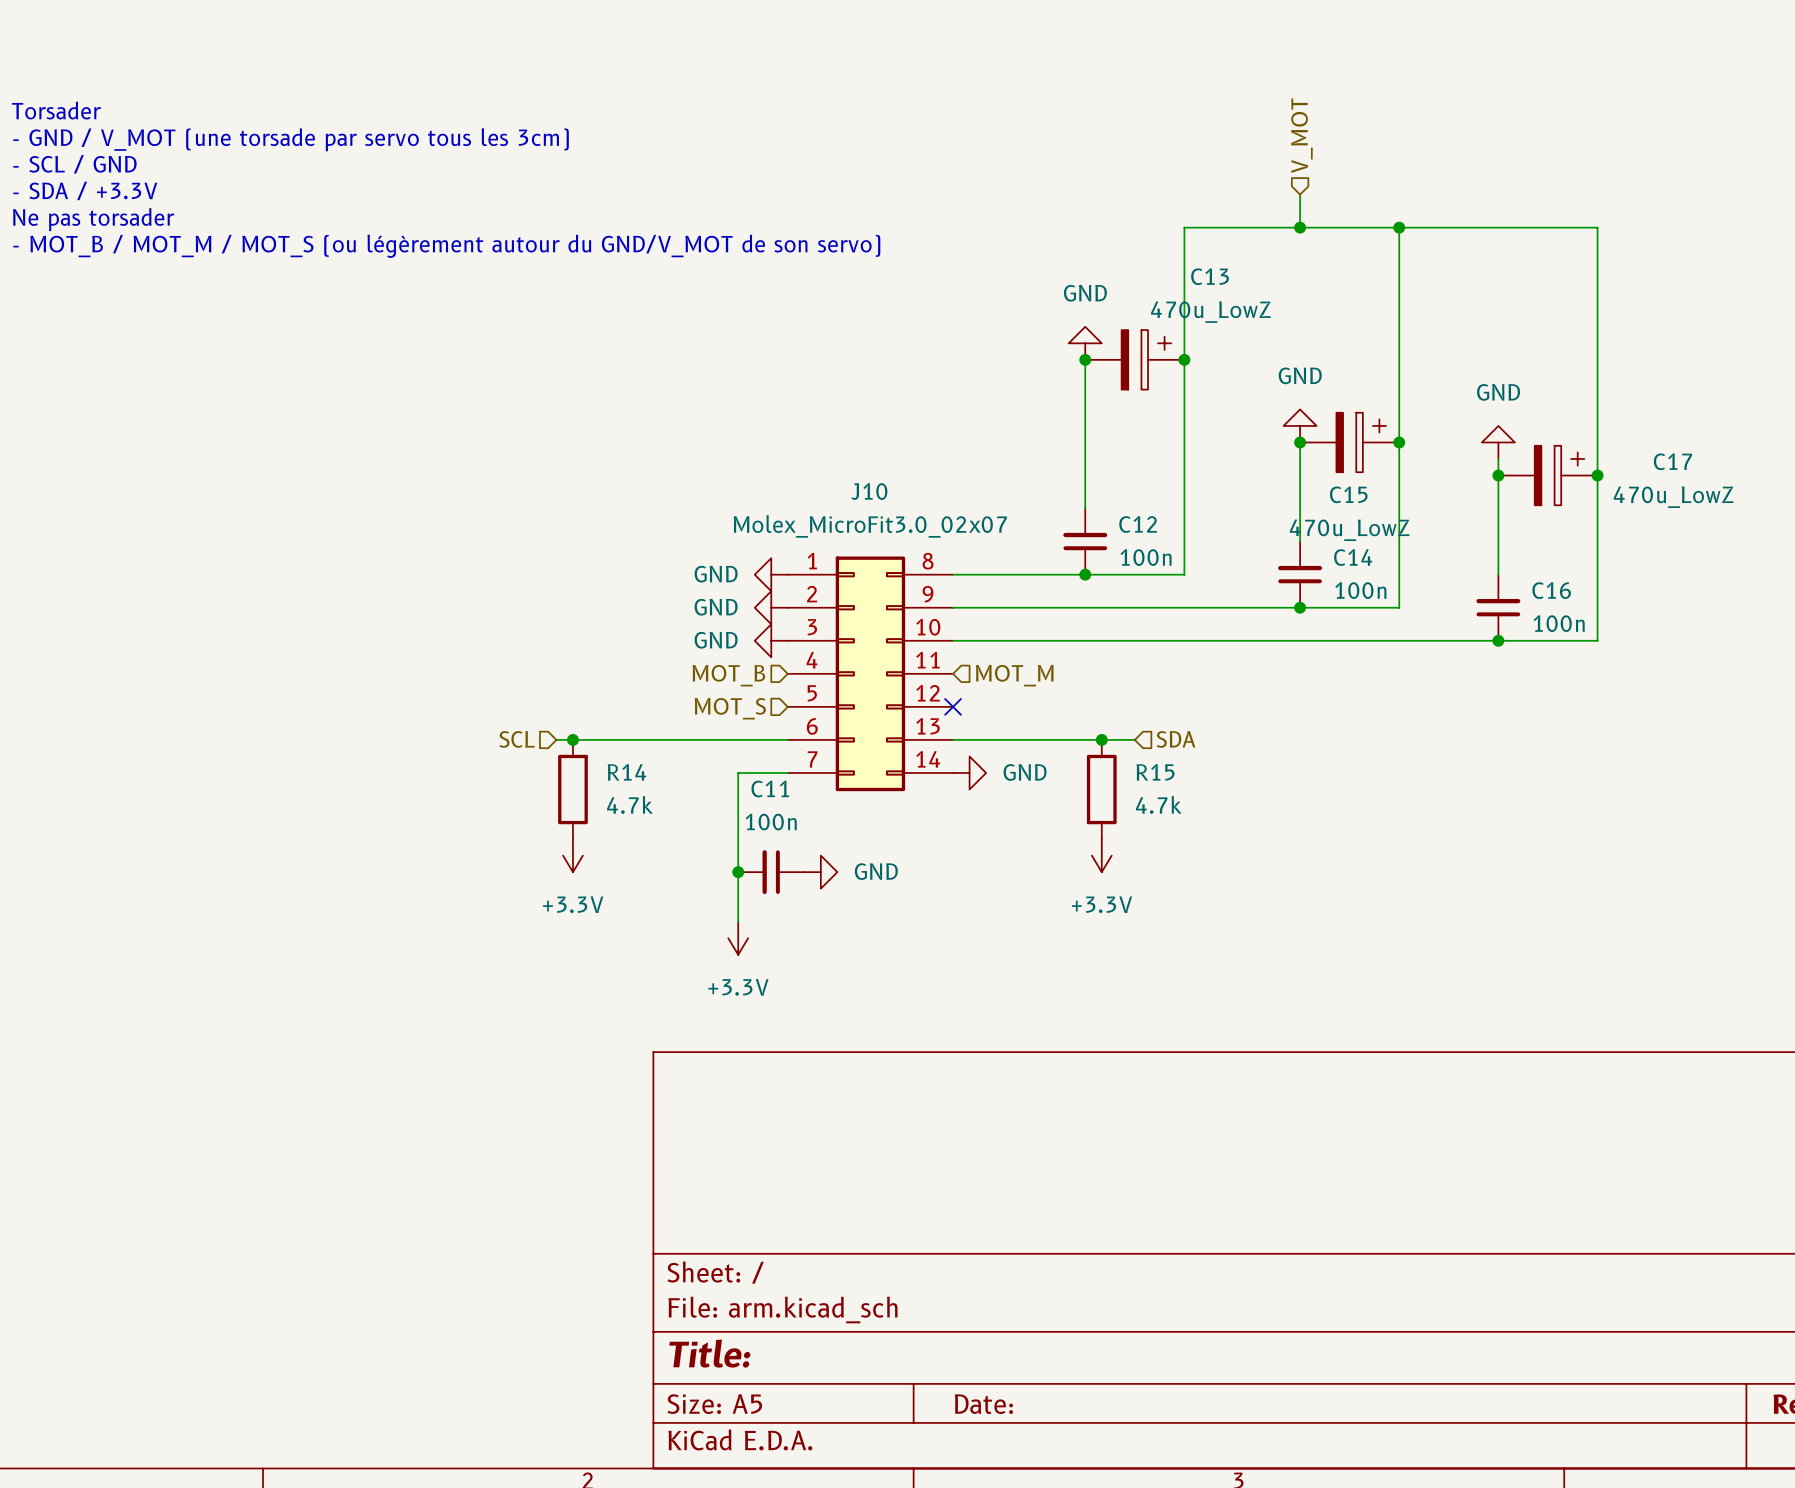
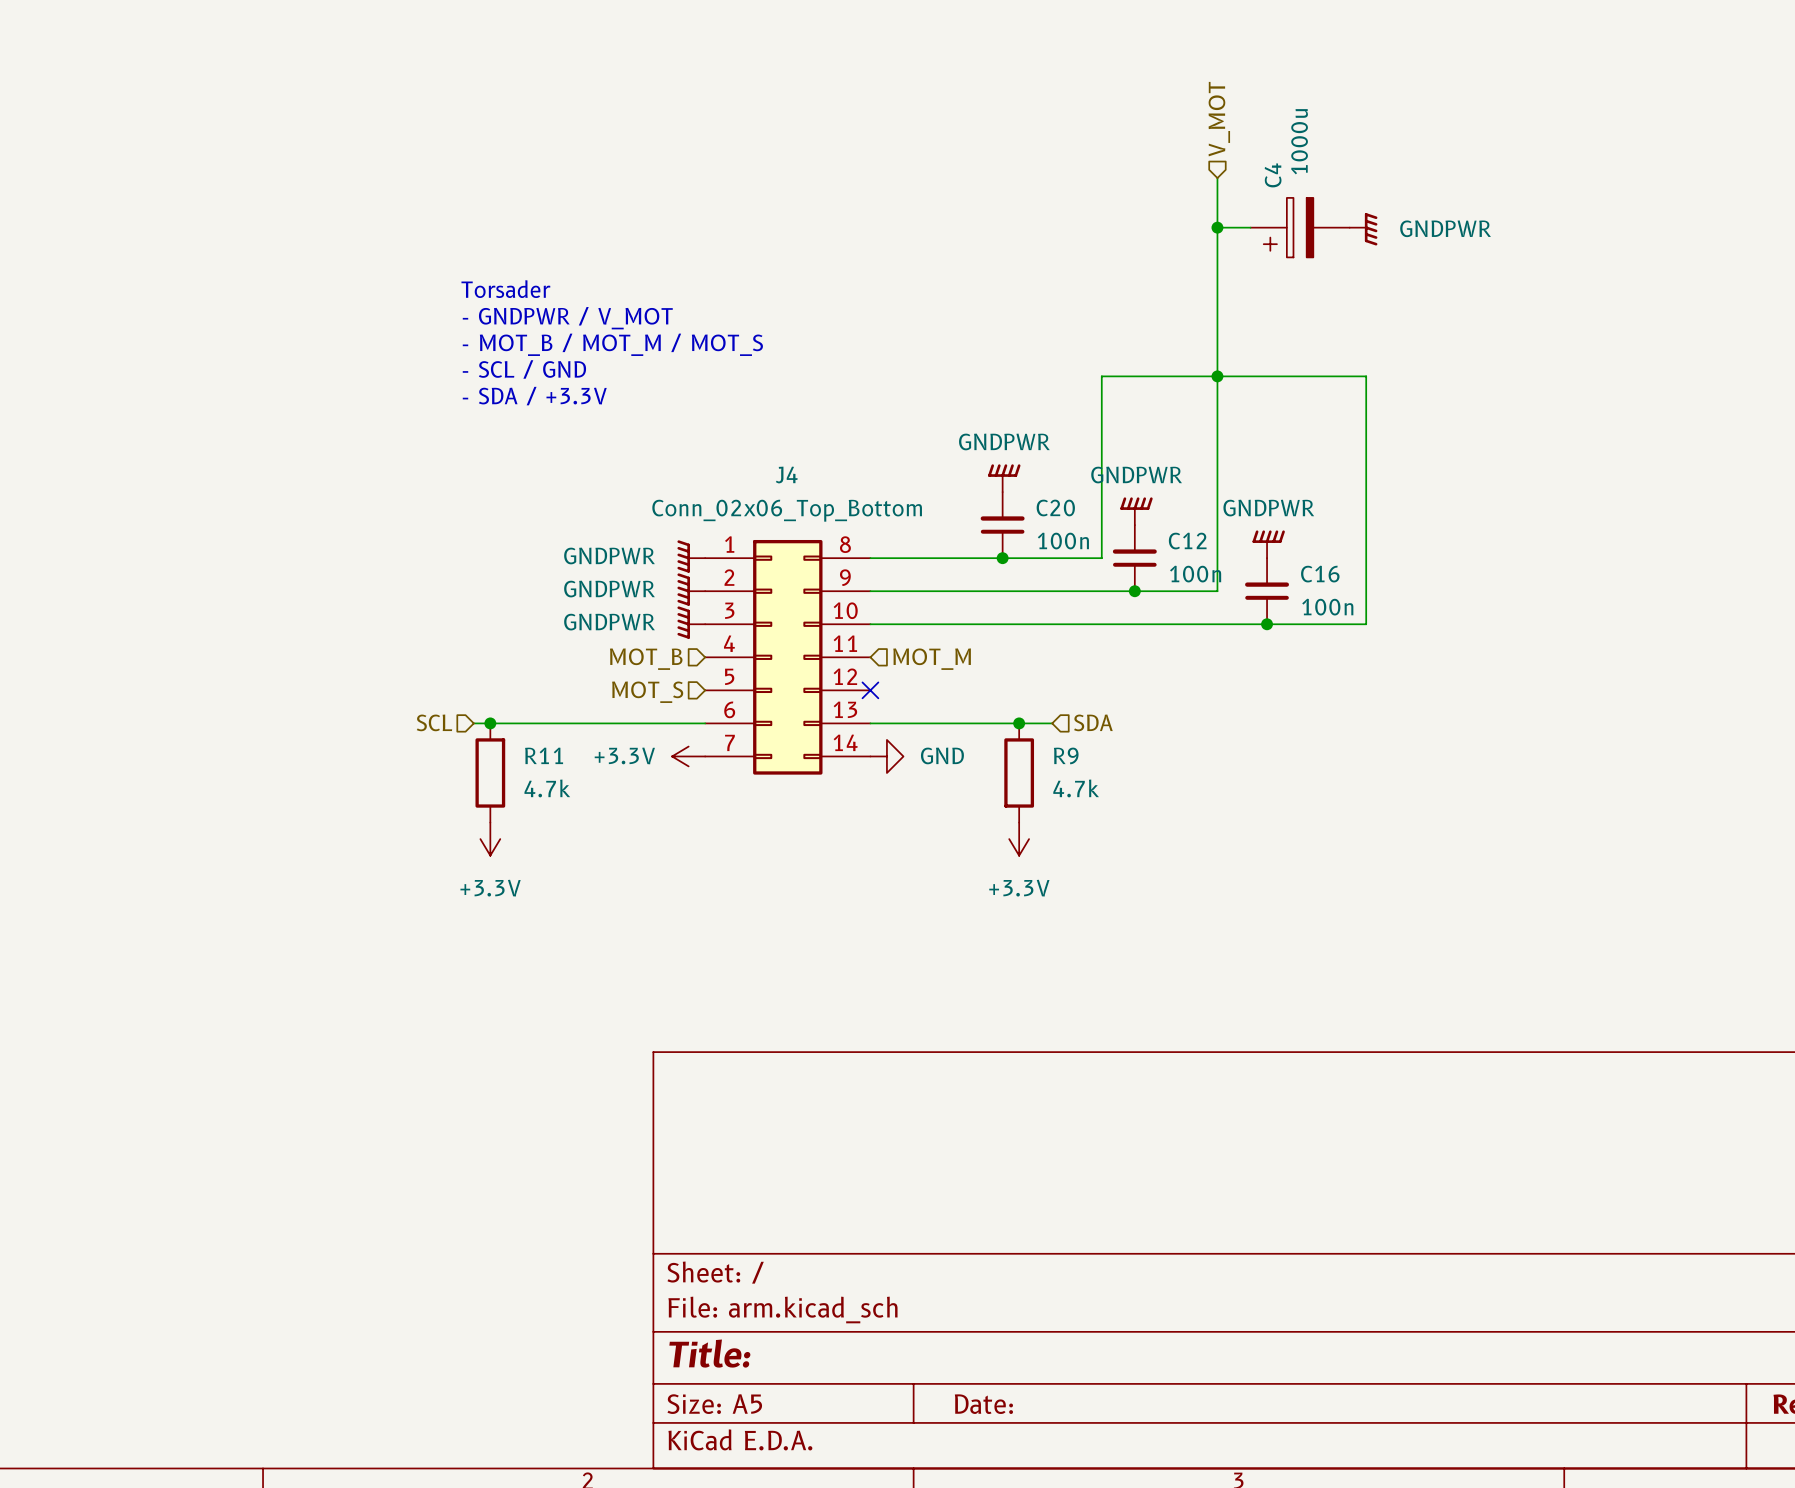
text: Torsader (56, 110) -> none
hierarchical label position: V_MOT (1301, 135) -> V_MOT (1219, 119)
text: - GND / V_MOT (une torsade par servo tous les 3cm) (291, 139) -> none
text: - SCL / GND (74, 164) -> none
wire: none -> (1217, 178) (1217, 591) (870, 591)
text: - SDA / +3.3V (85, 190) -> none
wire: (1300, 194) (1300, 227) -> none
text: Ne pas torsader (93, 219) -> none
wire: (1217, 227) (1184, 227) (1184, 574) (953, 574) -> none
junction: none -> (1217, 227)
wire: (1250, 227) (1597, 227) (1597, 640) (953, 640) -> none
junction: (1300, 227) -> none
C4: none -> 1000u (1300, 227)
wire: (1399, 227) (1399, 607) (953, 607) -> none
junction: (1399, 227) -> none
power symbol: none -> GNDPWR (1363, 229)
text: - MOT_B / MOT_M / MOT_S (ou légèrement autour du GND/V_MOT de son servo) (446, 246) -> none
text: none -> Torsader (505, 289)
text: none -> - GNDPWR / V_MOT (567, 318)
power symbol: GND (1085, 343) -> none
text: none -> - MOT_B / MOT_M / MOT_S (612, 344)
wire: (1085, 359) (1085, 508) -> none
junction: (1085, 359) -> none
C13: 470u_LowZ (1134, 359) -> none
junction position: (1184, 359) -> (1217, 376)
text: none -> - SCL / GND (524, 369)
text: none -> - SDA / +3.3V (534, 396)
power symbol: GND (1300, 425) -> none
wire: (1300, 442) (1300, 541) -> none
junction: (1300, 442) -> none
C15: 470u_LowZ (1349, 442) -> none
junction: (1399, 442) -> none
power symbol: GND (1498, 442) -> none
wire: (1498, 459) (1498, 574) -> none
junction: (1498, 475) -> none
C17: 470u_LowZ (1547, 475) -> none
junction: (1597, 475) -> none
power symbol: none -> GNDPWR (1004, 478)
power symbol: none -> GNDPWR (1136, 511)
C20: none -> 100n (1002, 525)
C12 position: (1085, 541) -> (1134, 558)
power symbol: none -> GNDPWR (1268, 544)
power symbol: none -> GNDPWR (691, 556)
wire: none -> (870, 558) (1101, 558) (1101, 376) (1366, 376) (1366, 624) (870, 624)
junction: none -> (1002, 558)
power symbol: GND (771, 574) -> none
junction: (1085, 574) -> none
C14: 100n (1300, 574) -> none
power symbol: none -> GNDPWR (691, 589)
junction: none -> (1134, 591)
power symbol: GND (771, 607) -> none
junction position: (1300, 607) -> (1267, 624)
C16 position: (1498, 607) -> (1267, 591)
power symbol: none -> GNDPWR (691, 622)
power symbol: GND (771, 640) -> none
junction: (1498, 640) -> none
J4: none -> Conn_02x06_Top_Bottom (787, 657)
J10: Molex_MicroFit3.0_02x07 (870, 673) -> none
hierarchical label position: MOT_B (728, 675) -> MOT_B (646, 659)
hierarchical label position: MOT_M (1014, 675) -> MOT_M (932, 659)
no-connect mark: none -> (870, 690)
no-connect mark: (953, 706) -> none
hierarchical label position: MOT_S (730, 708) -> MOT_S (647, 692)
junction: none -> (490, 723)
junction: none -> (1019, 723)
hierarchical label position: SCL (517, 739) -> SCL (434, 722)
wire: (556, 739) (787, 739) -> (473, 723) (705, 723)
junction: (572, 739) -> none
wire: (953, 739) (1134, 739) -> (870, 723) (1052, 723)
junction: (1101, 739) -> none
hierarchical label position: SDA (1176, 739) -> SDA (1093, 722)
power symbol: none -> +3.3V (688, 756)
power symbol: none -> GND (886, 756)
R11: none -> 4.7k (490, 772)
wire: (787, 772) (738, 772) (738, 921) -> none
power symbol: GND (969, 772) -> none
R9: none -> 4.7k (1019, 772)
R14: 4.7k (572, 789) -> none
R15: 4.7k (1101, 789) -> none
power symbol: none -> +3.3V (490, 839)
power symbol: +3.3V (572, 855) -> none
power symbol position: +3.3V (1101, 855) -> +3.3V (1019, 839)
junction: (738, 872) -> none
C11: 100n (771, 872) -> none
power symbol: GND (820, 872) -> none
power symbol: +3.3V (738, 938) -> none

